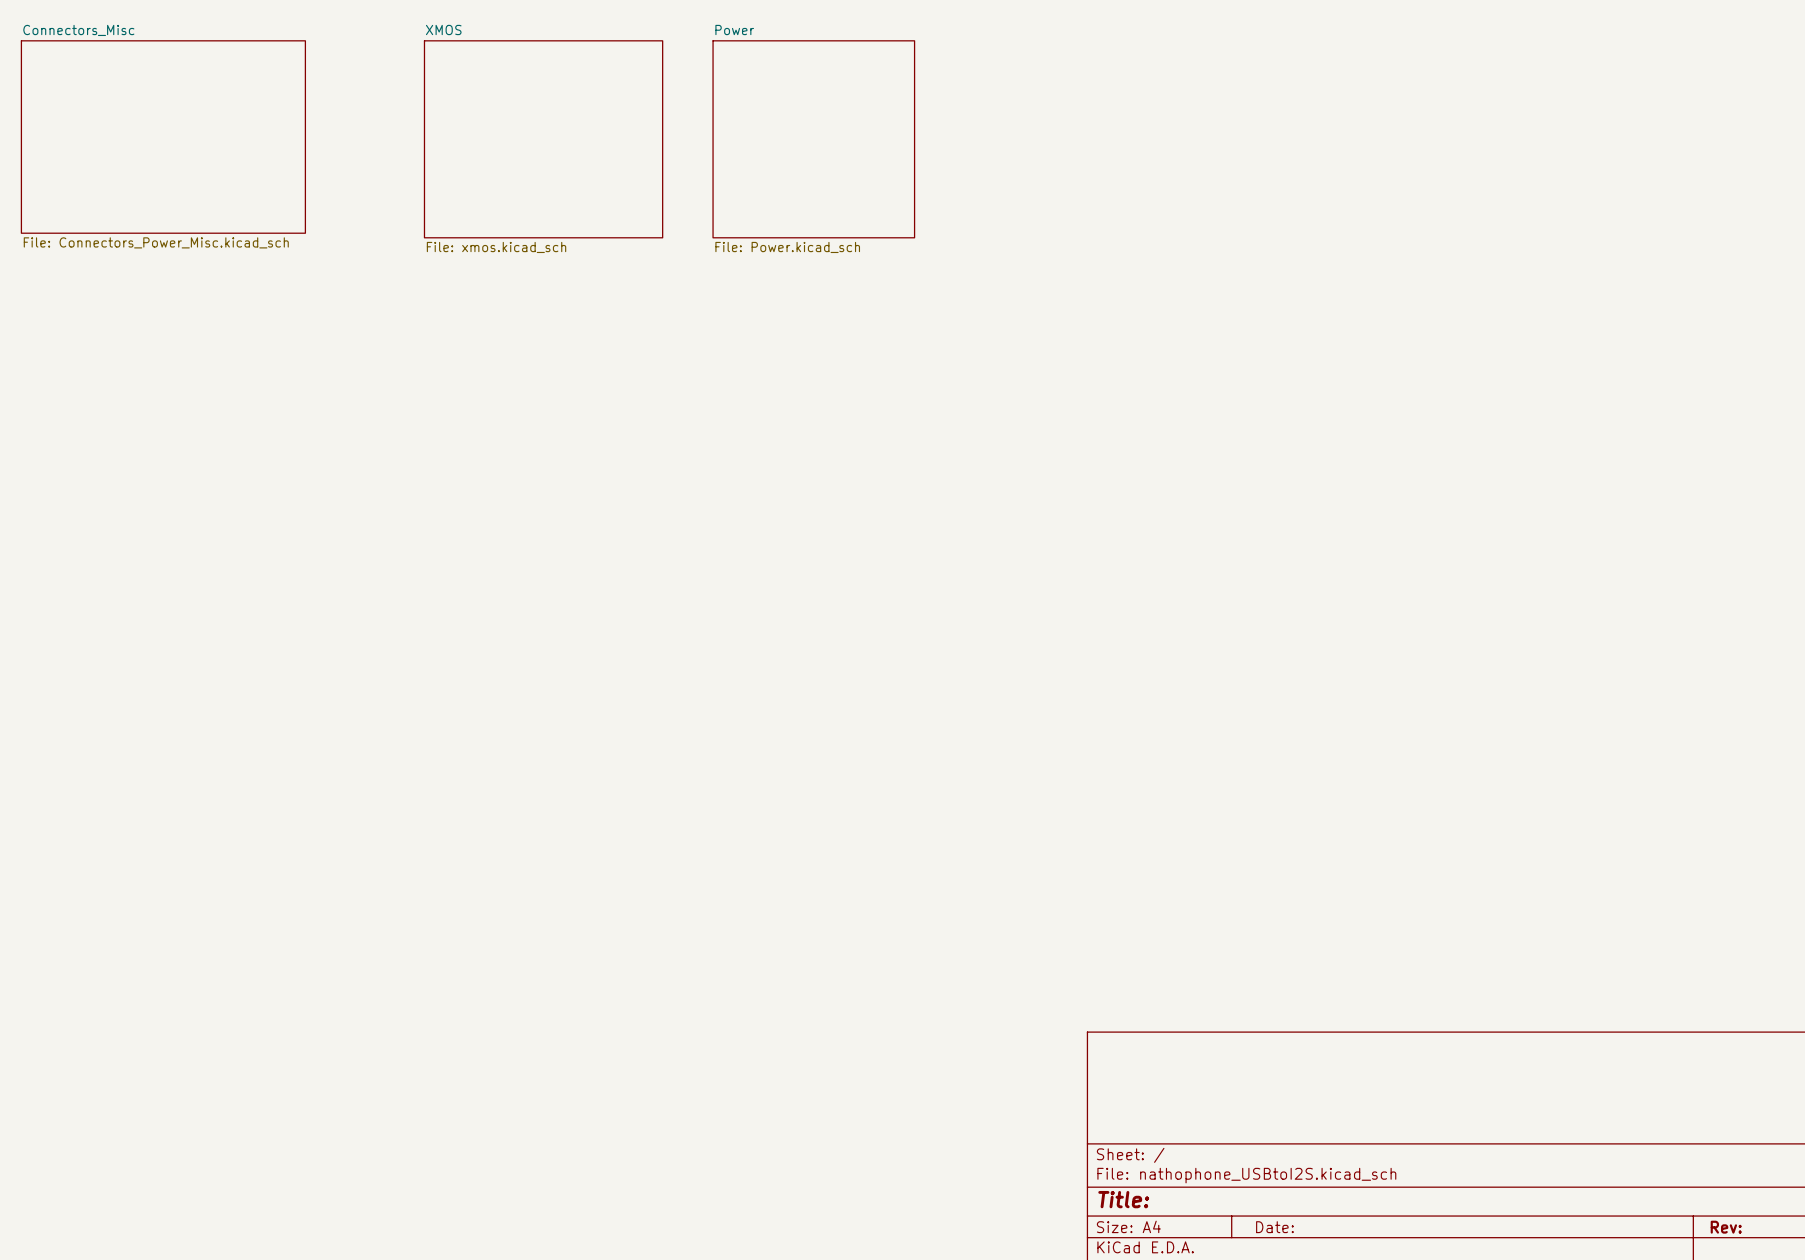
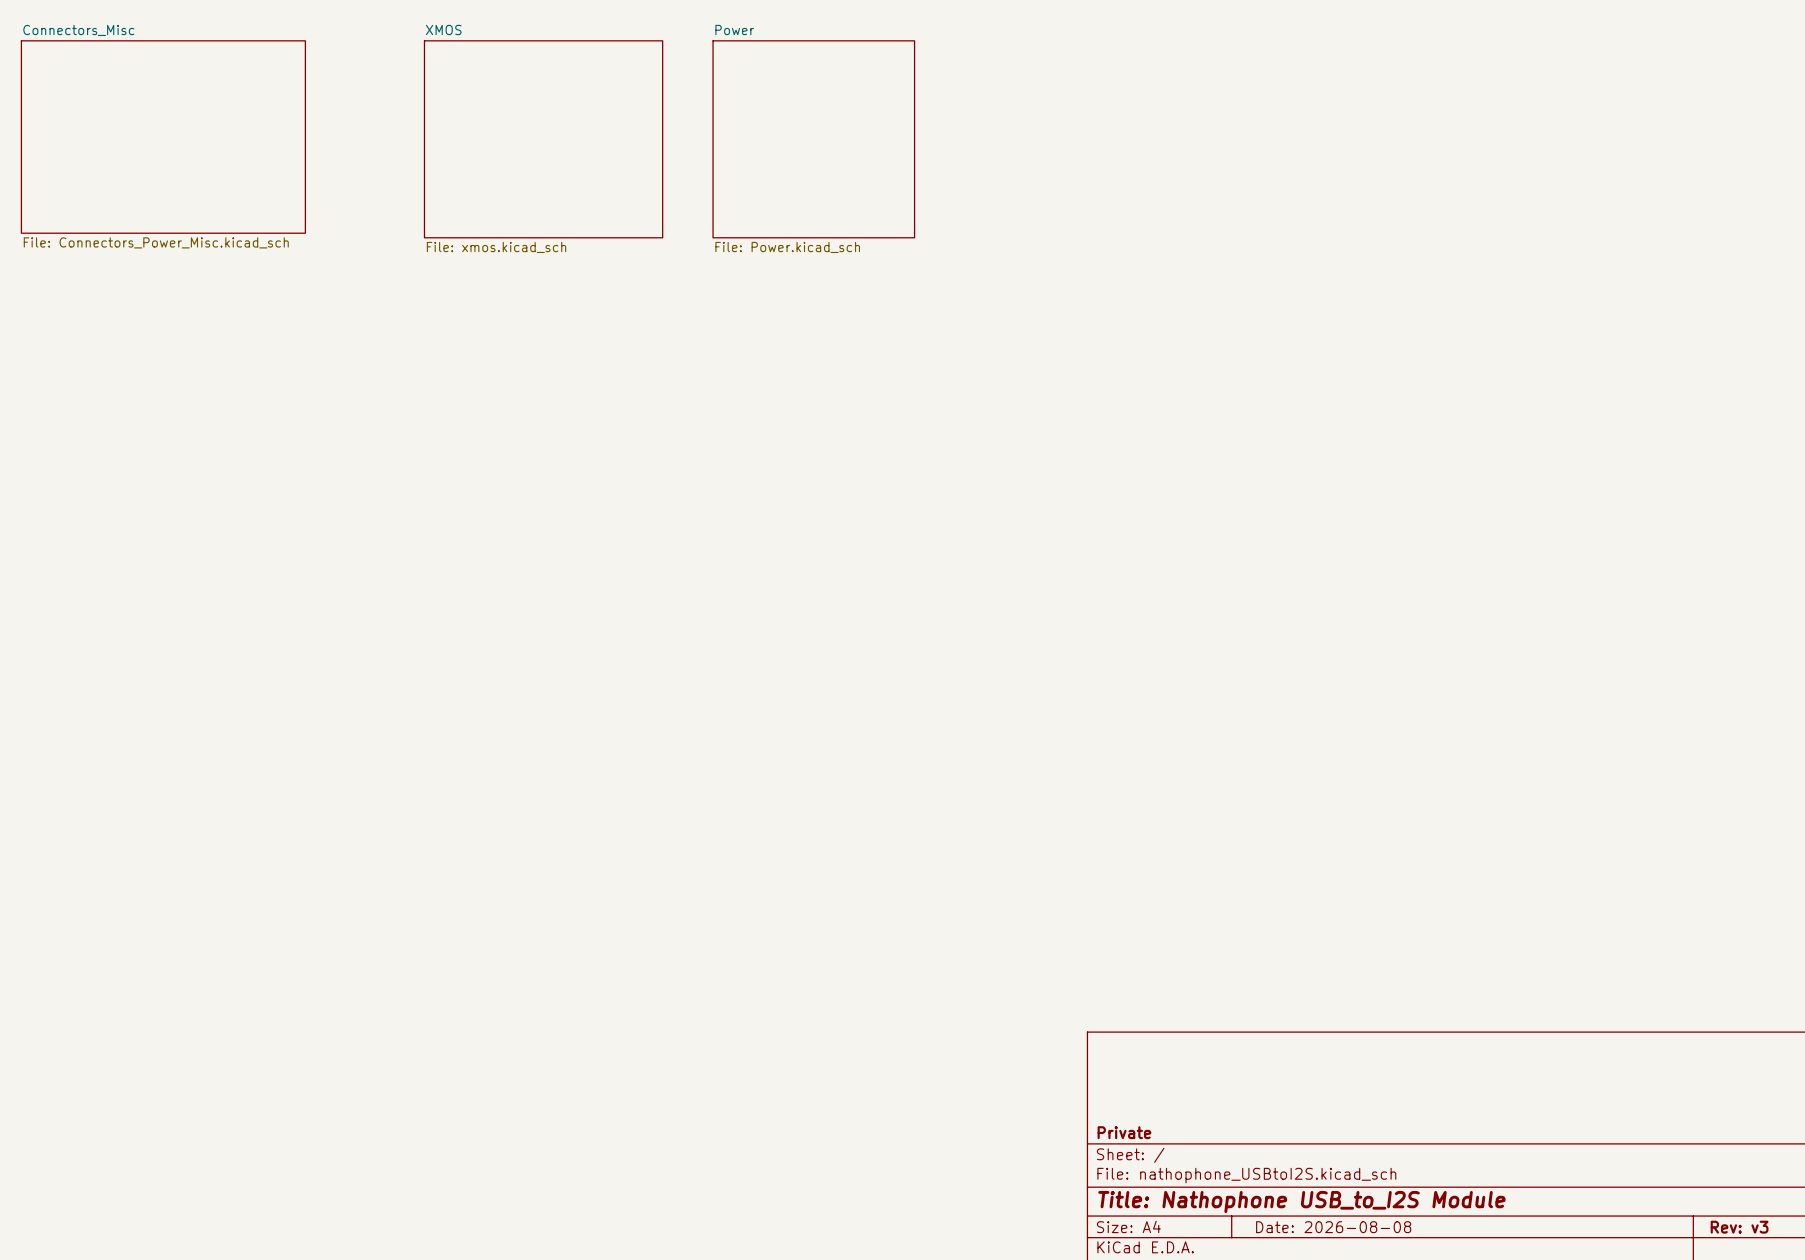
title block: none -> Private (1124, 1132)
title block: Title: (1123, 1199) -> Title: Nathophone USB_to_I2S Module (1301, 1202)
title block: Date: (1274, 1227) -> Date: 2026-08-08 (1333, 1227)
title block: Rev: (1726, 1227) -> Rev: v3 (1739, 1227)

